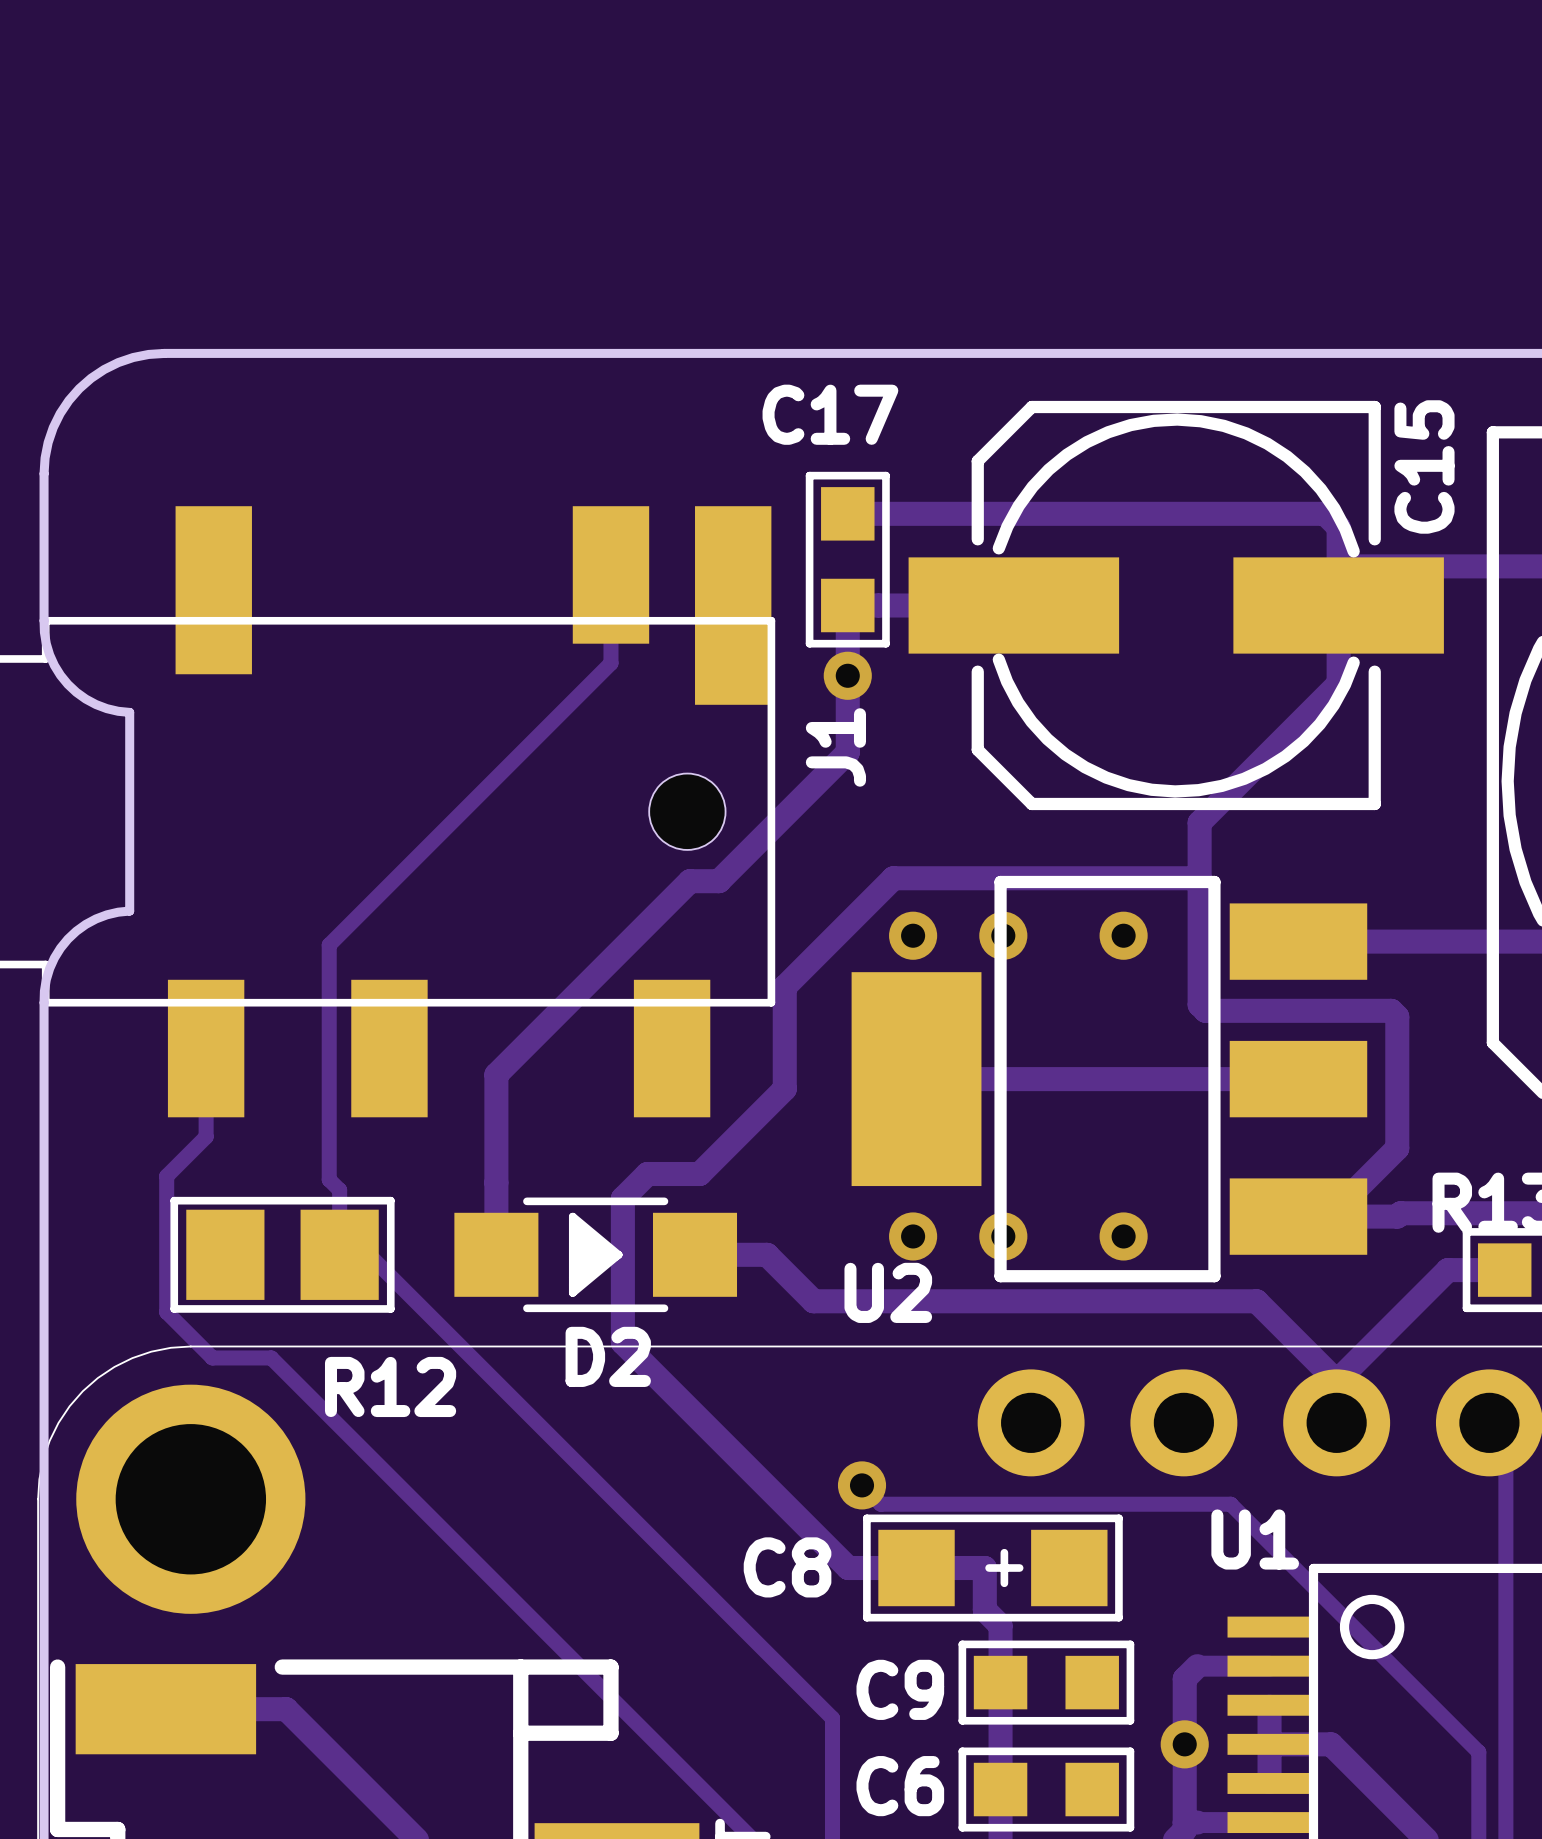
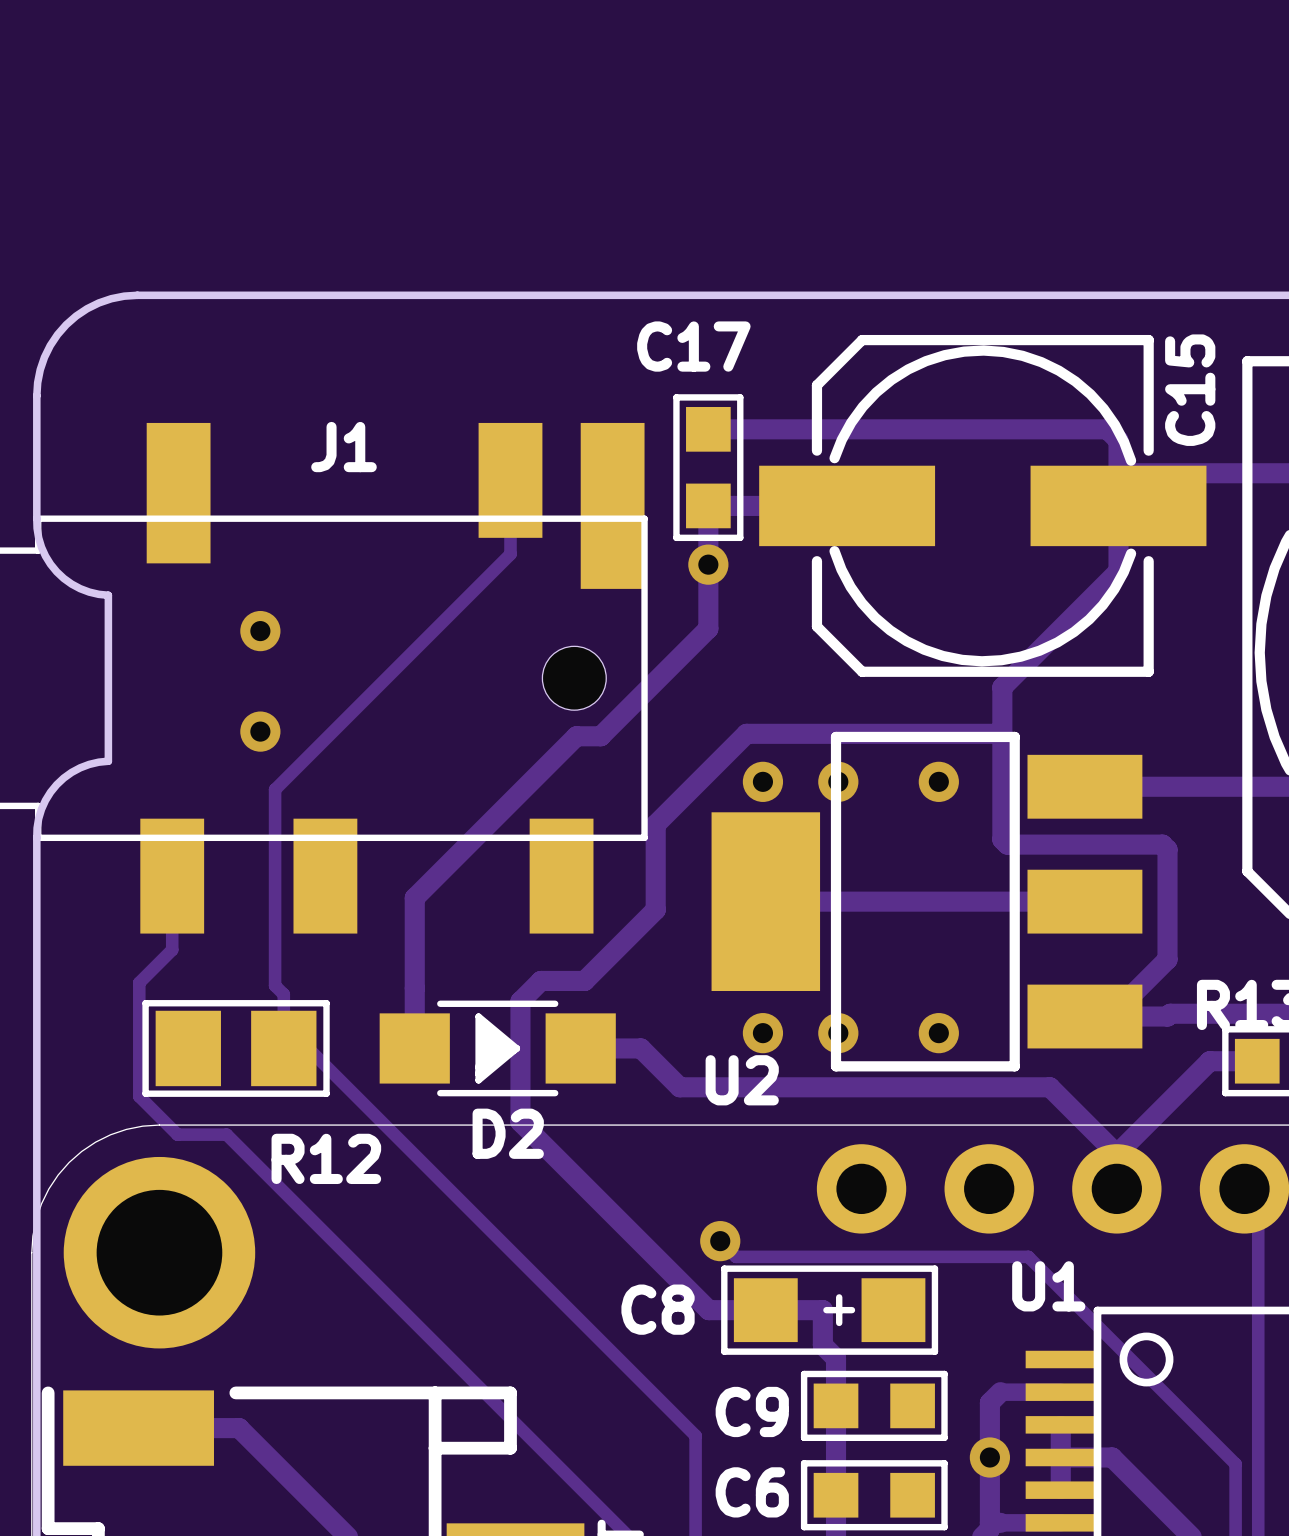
J1 name rotation: 0° (835, 747) -> 90° clockwise (343, 447)
J1 name position: J1 (835, 747) -> J1 (343, 447)
via: none -> (260, 631)
via: none -> (260, 731)

